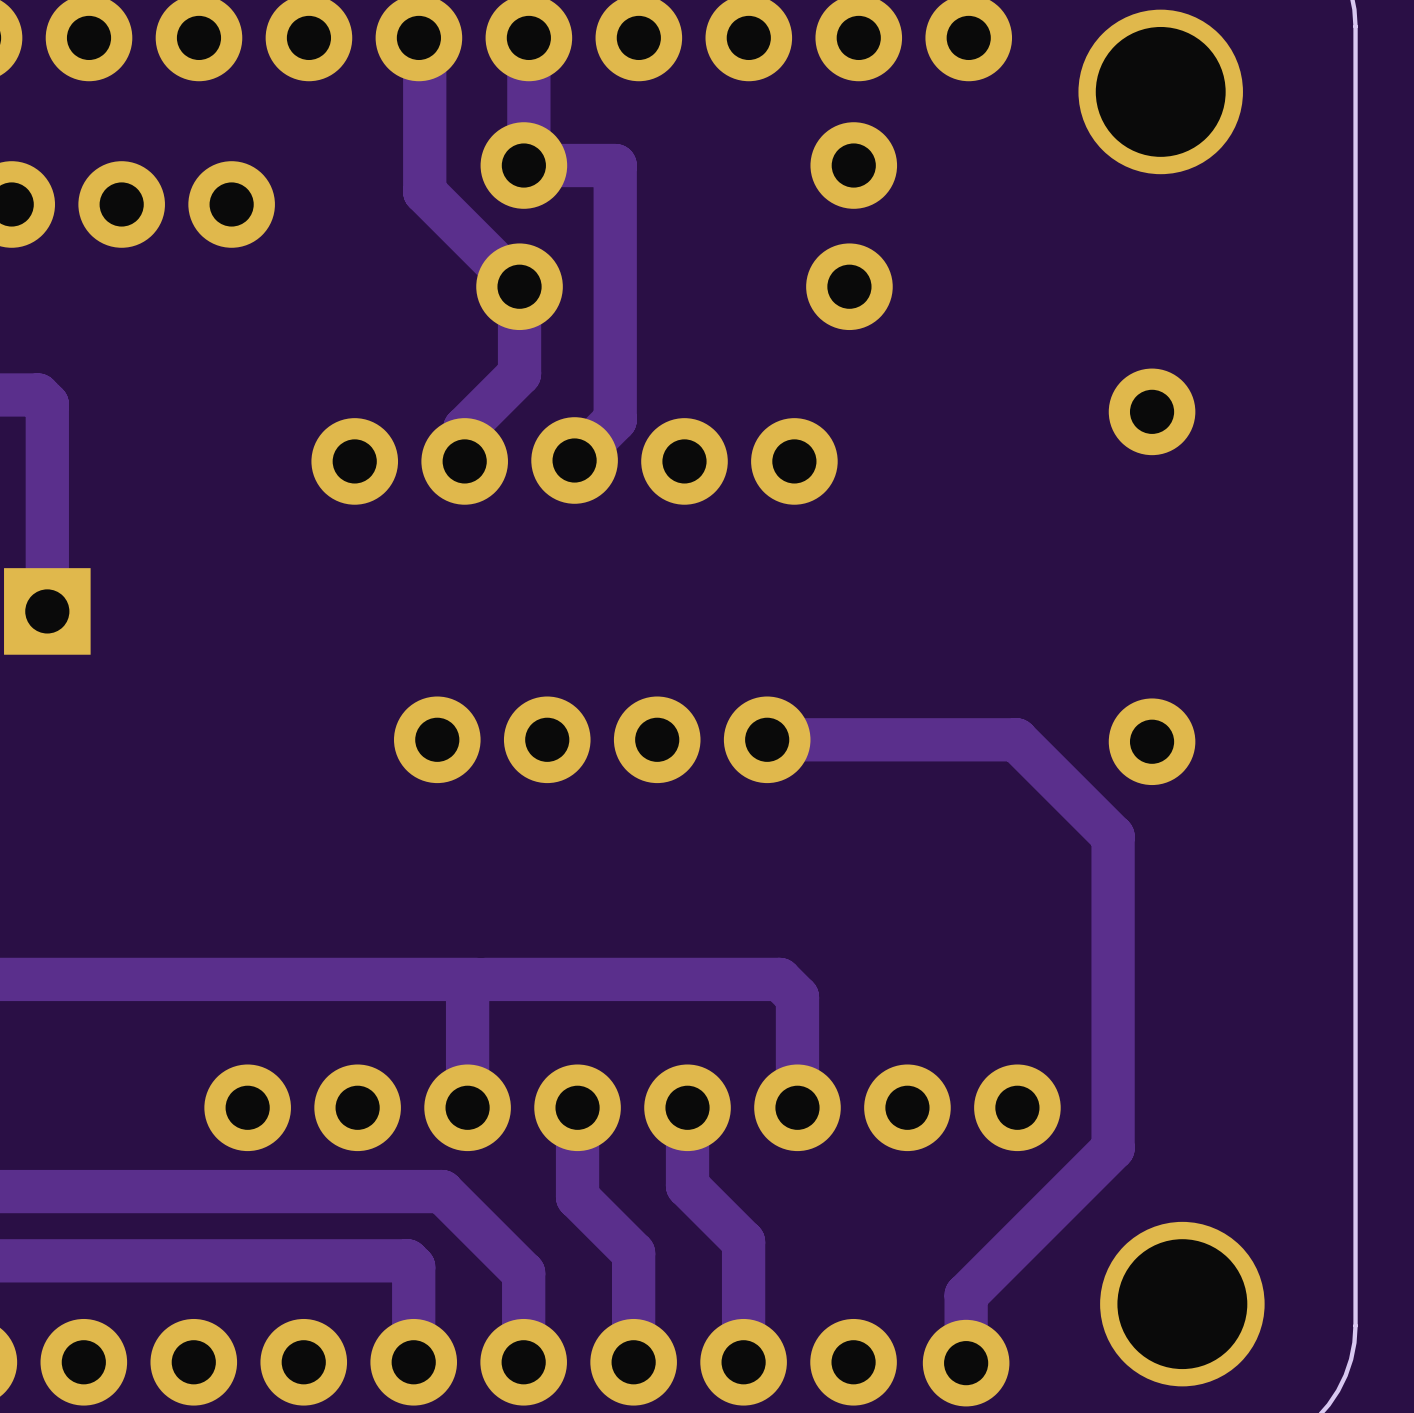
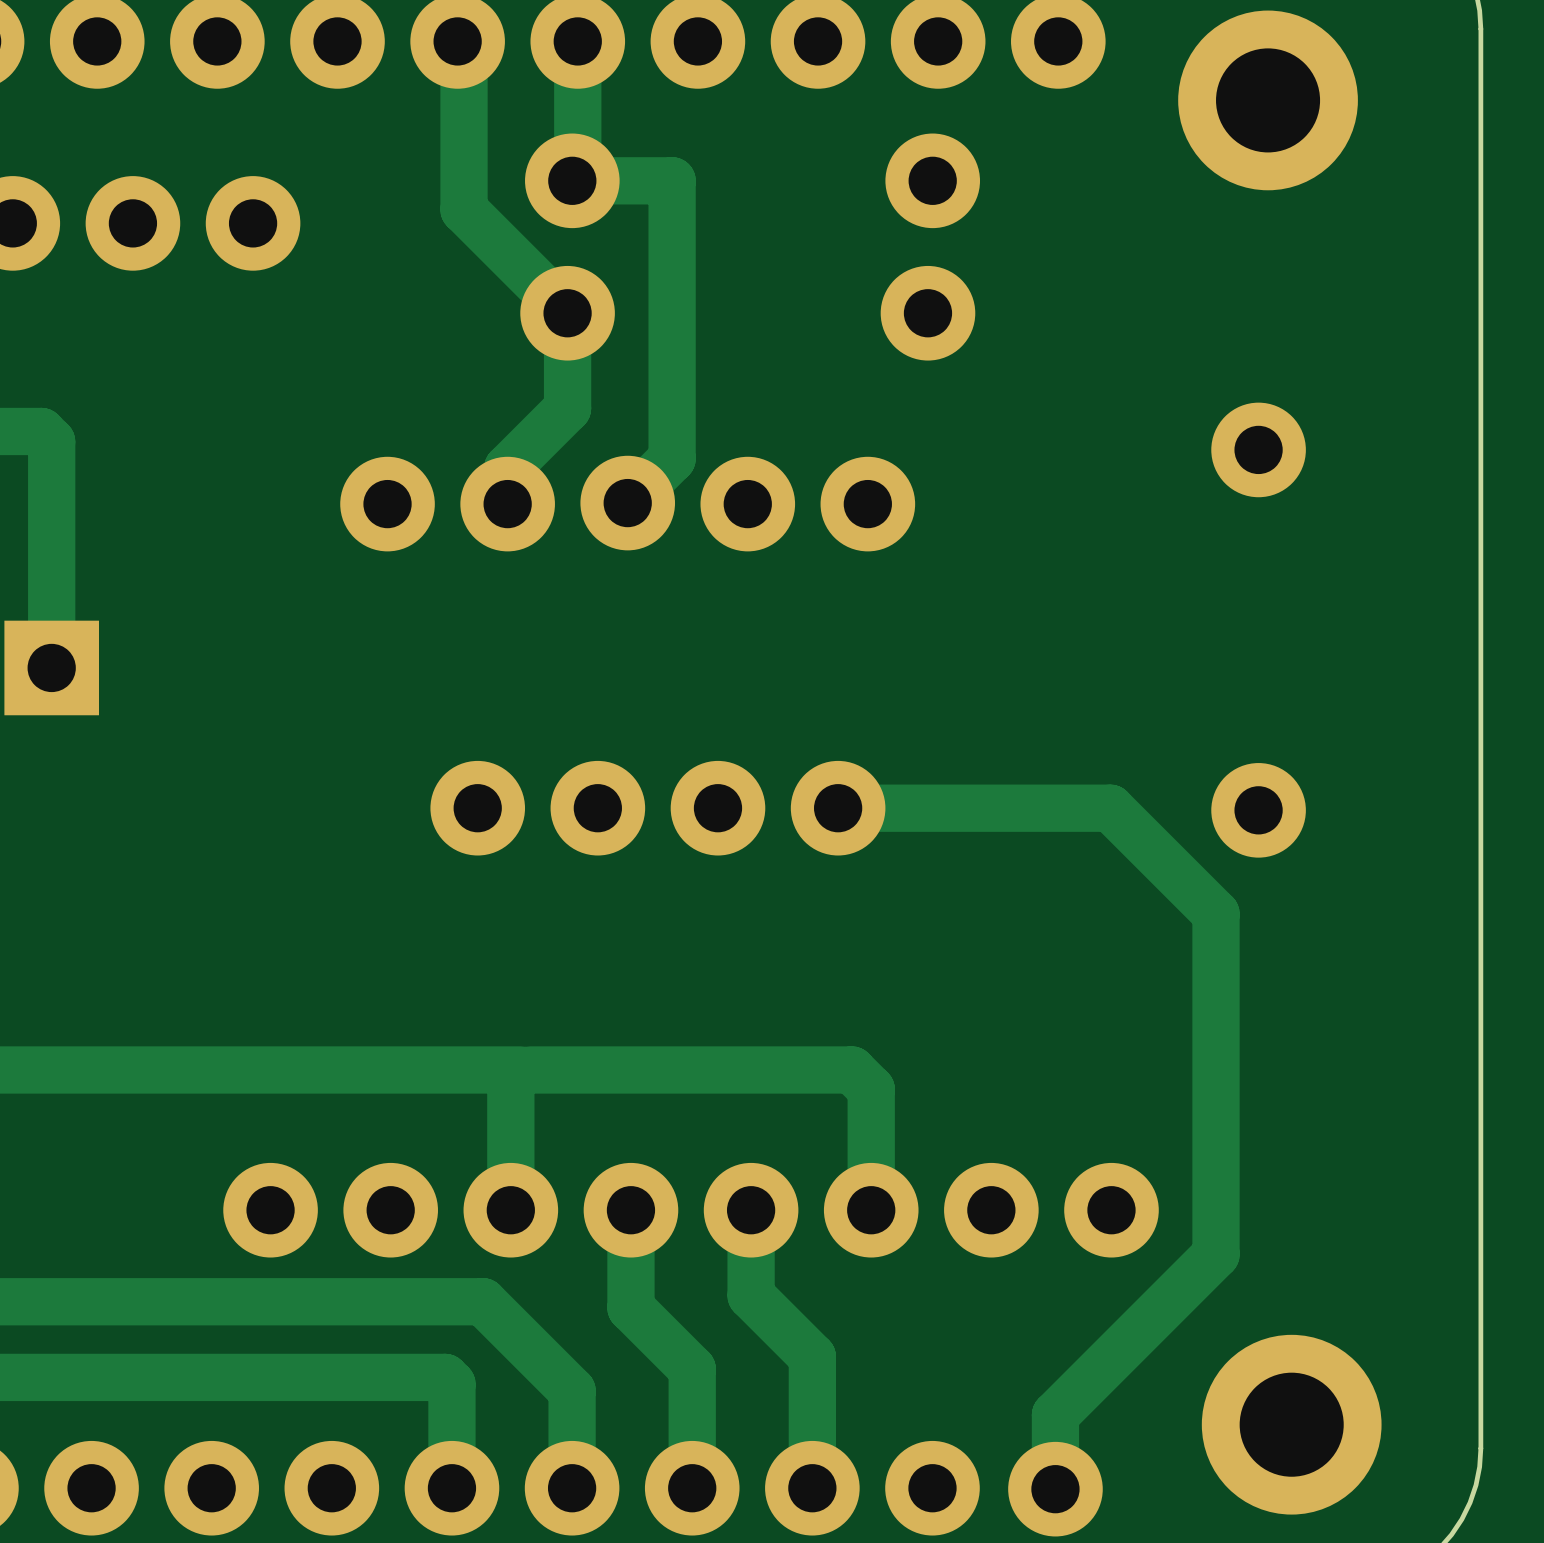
part footprint: [1078, 9, 1243, 175] -> [1178, 10, 1358, 191]
part footprint: [1100, 1221, 1265, 1387] -> [1201, 1334, 1382, 1515]

